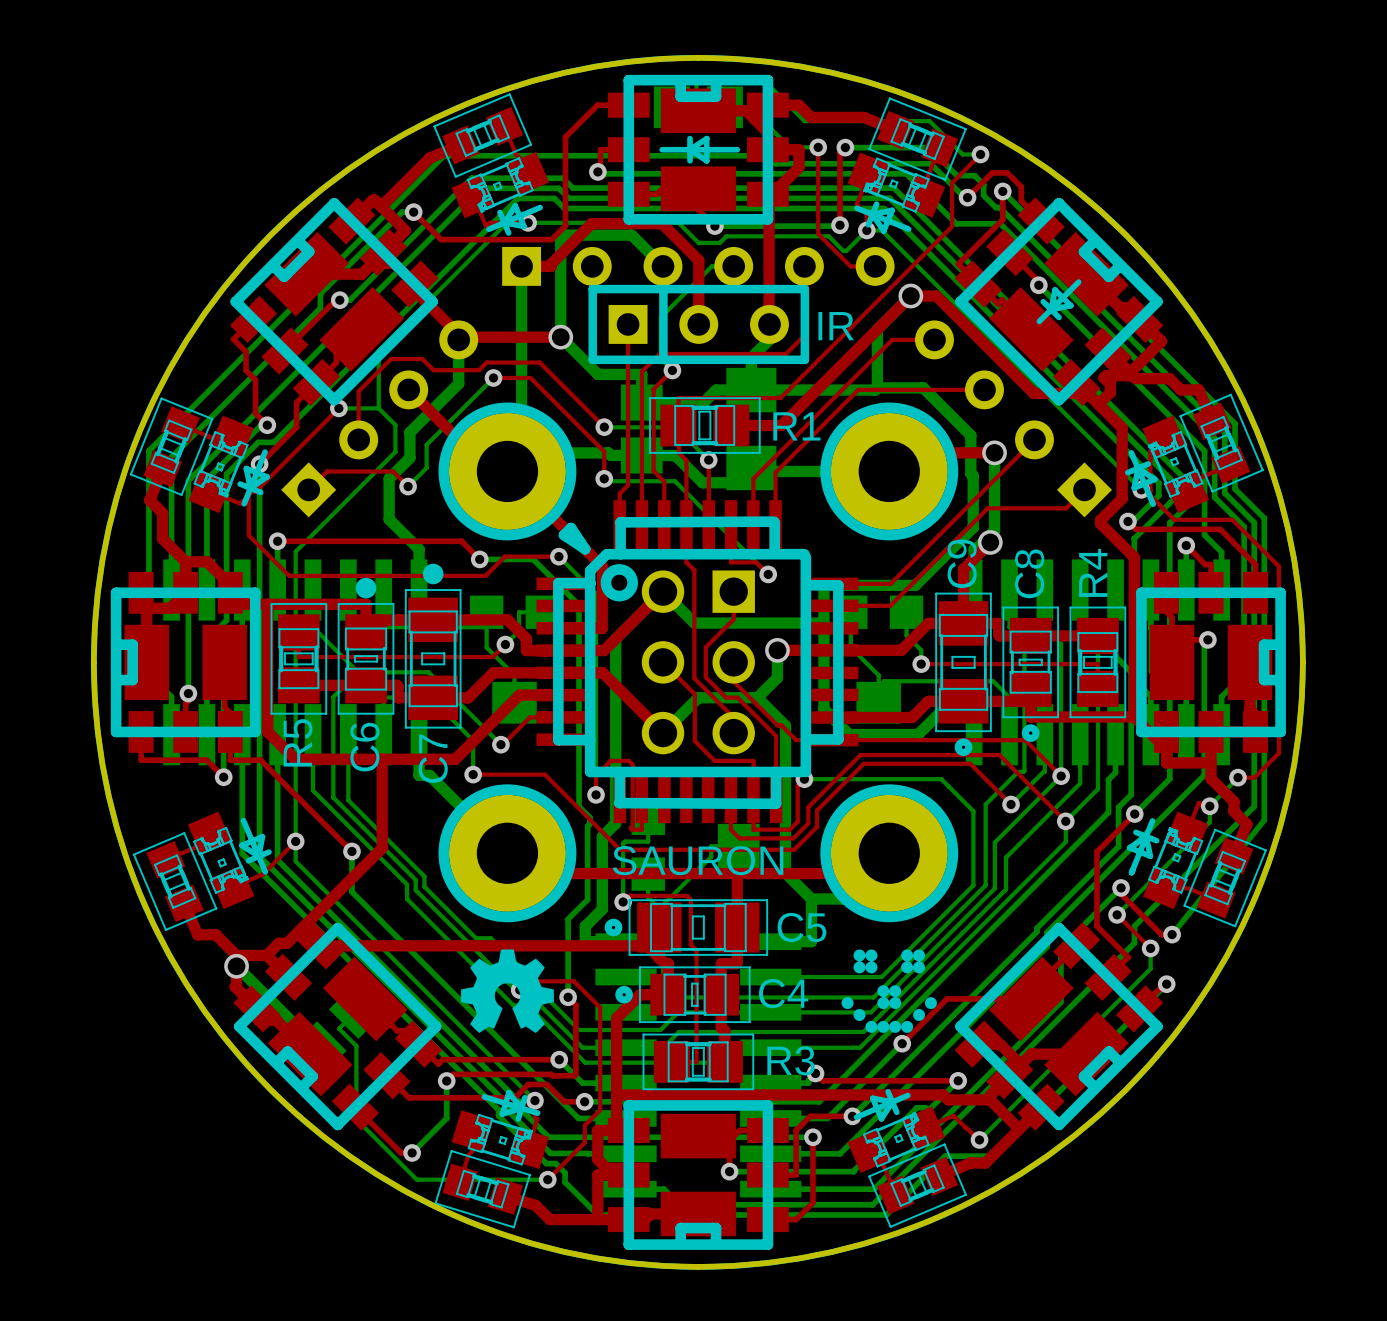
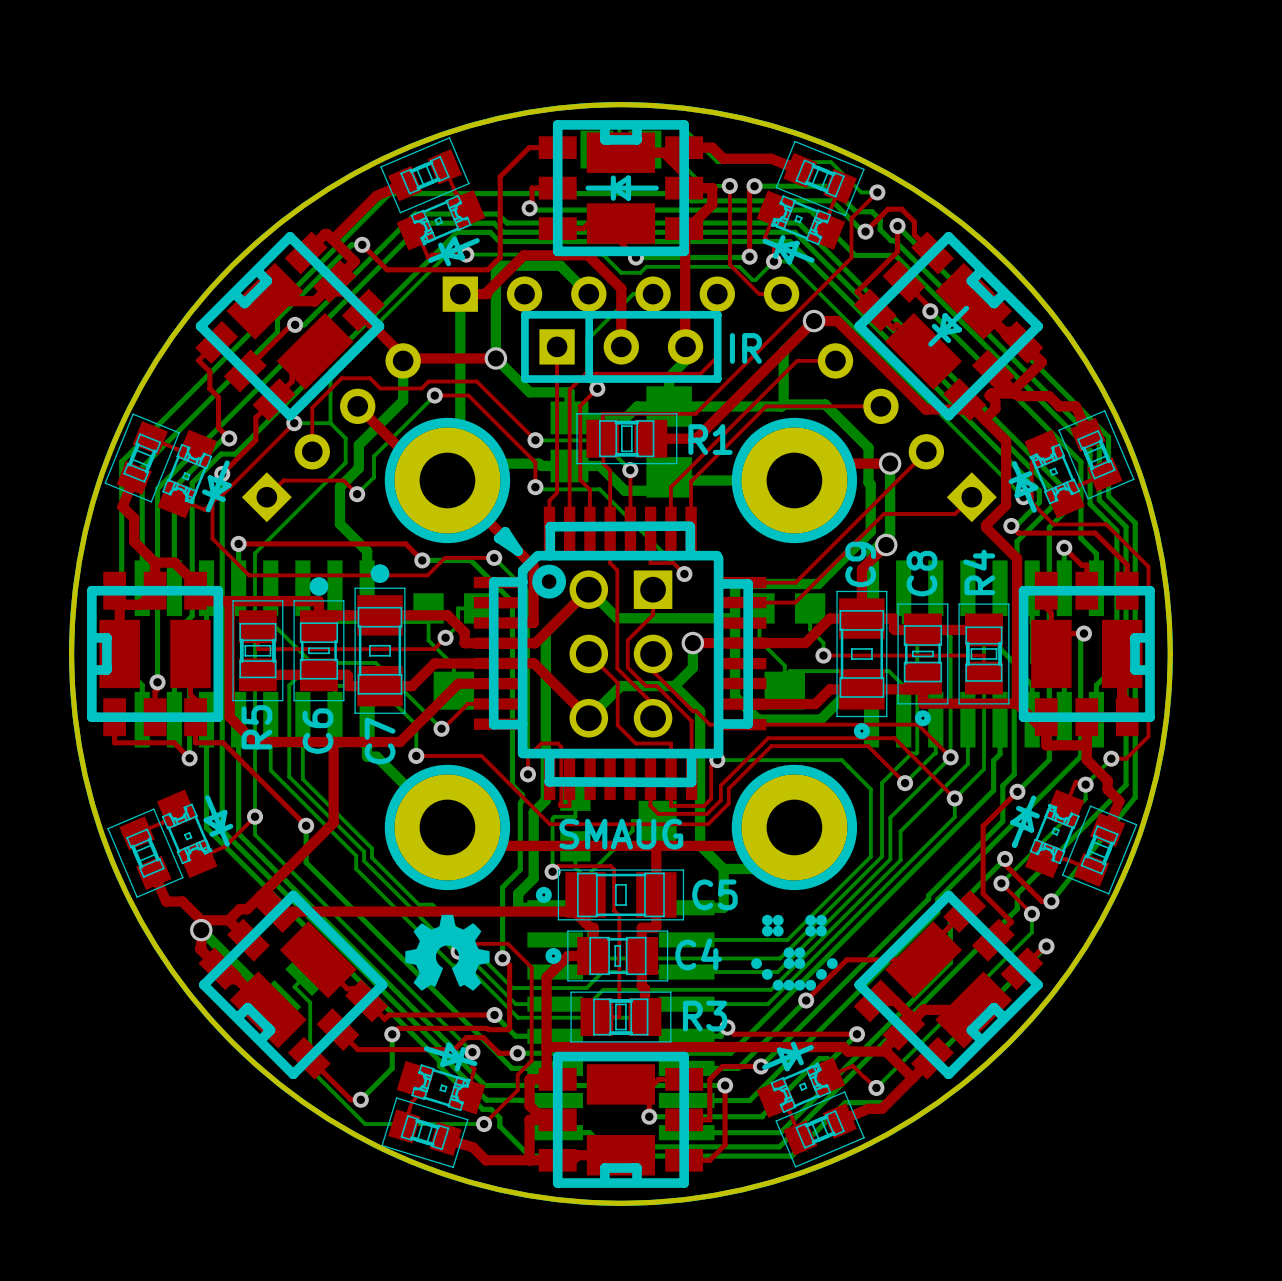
text: SAURON (698, 860) -> SMAUG (621, 834)

